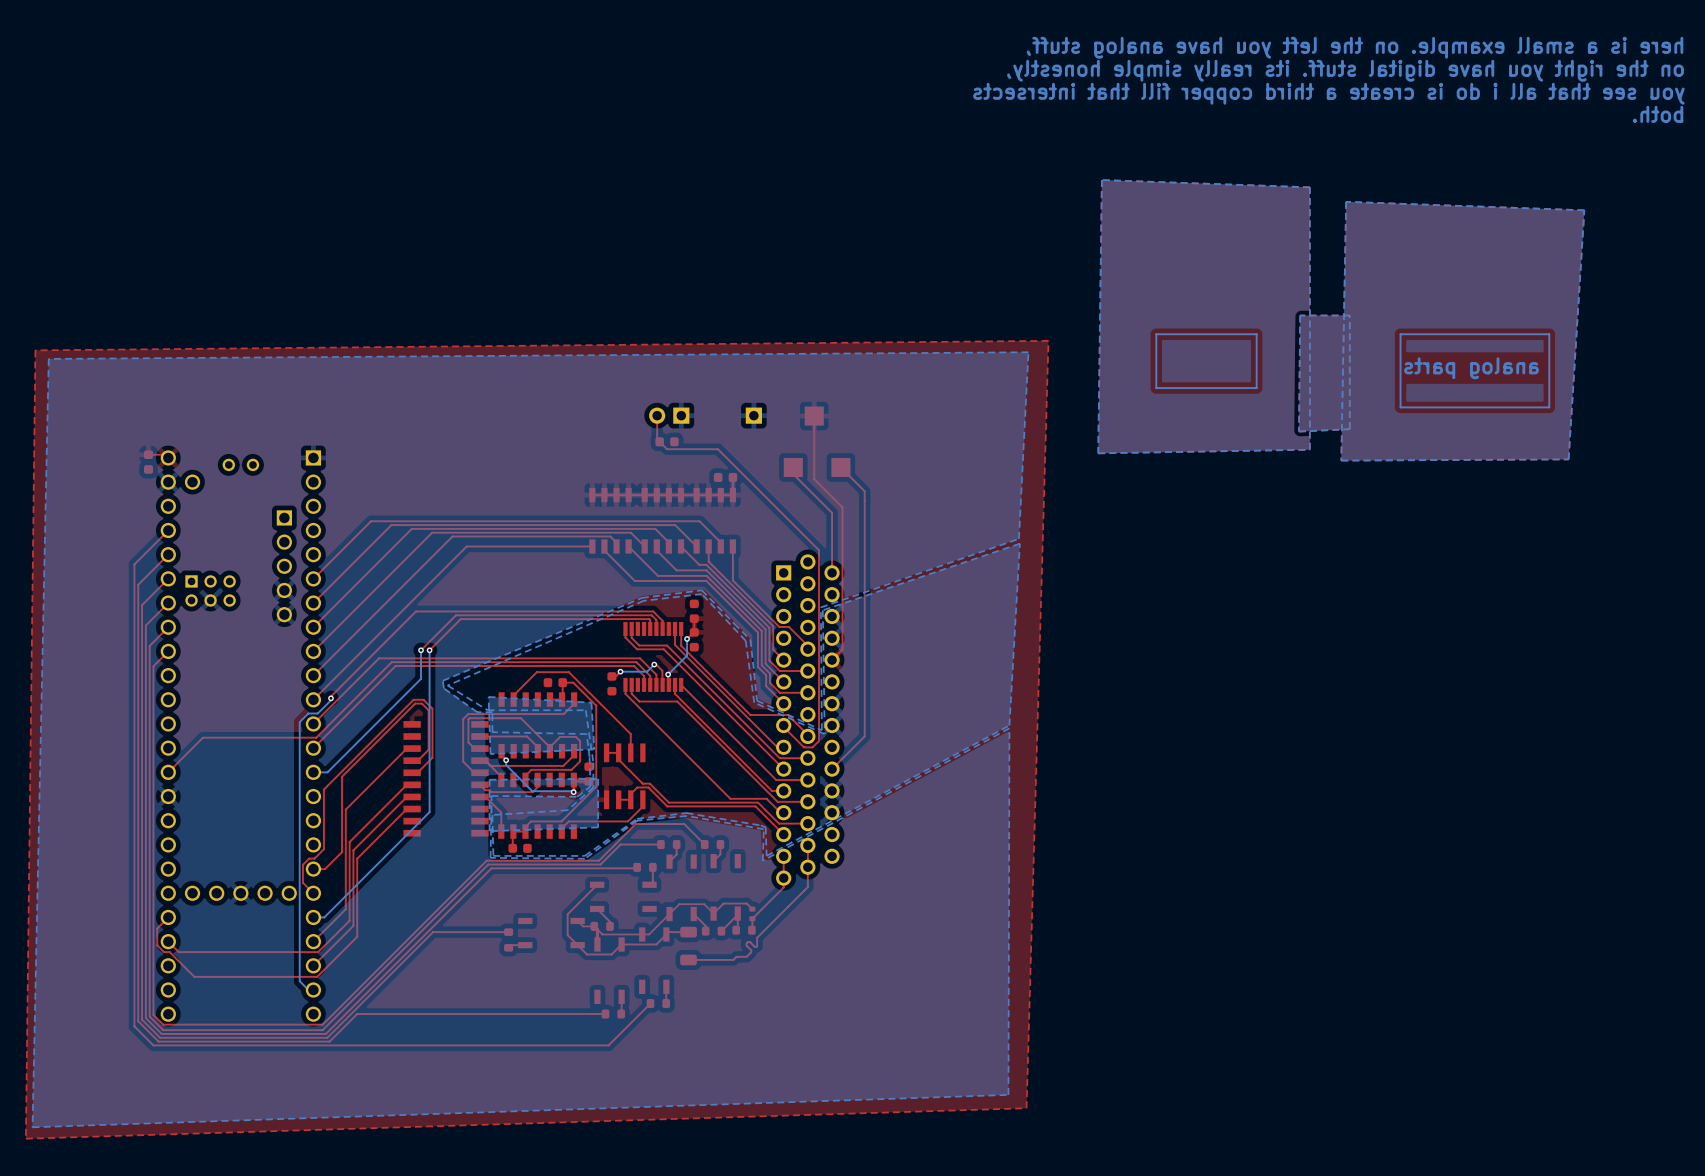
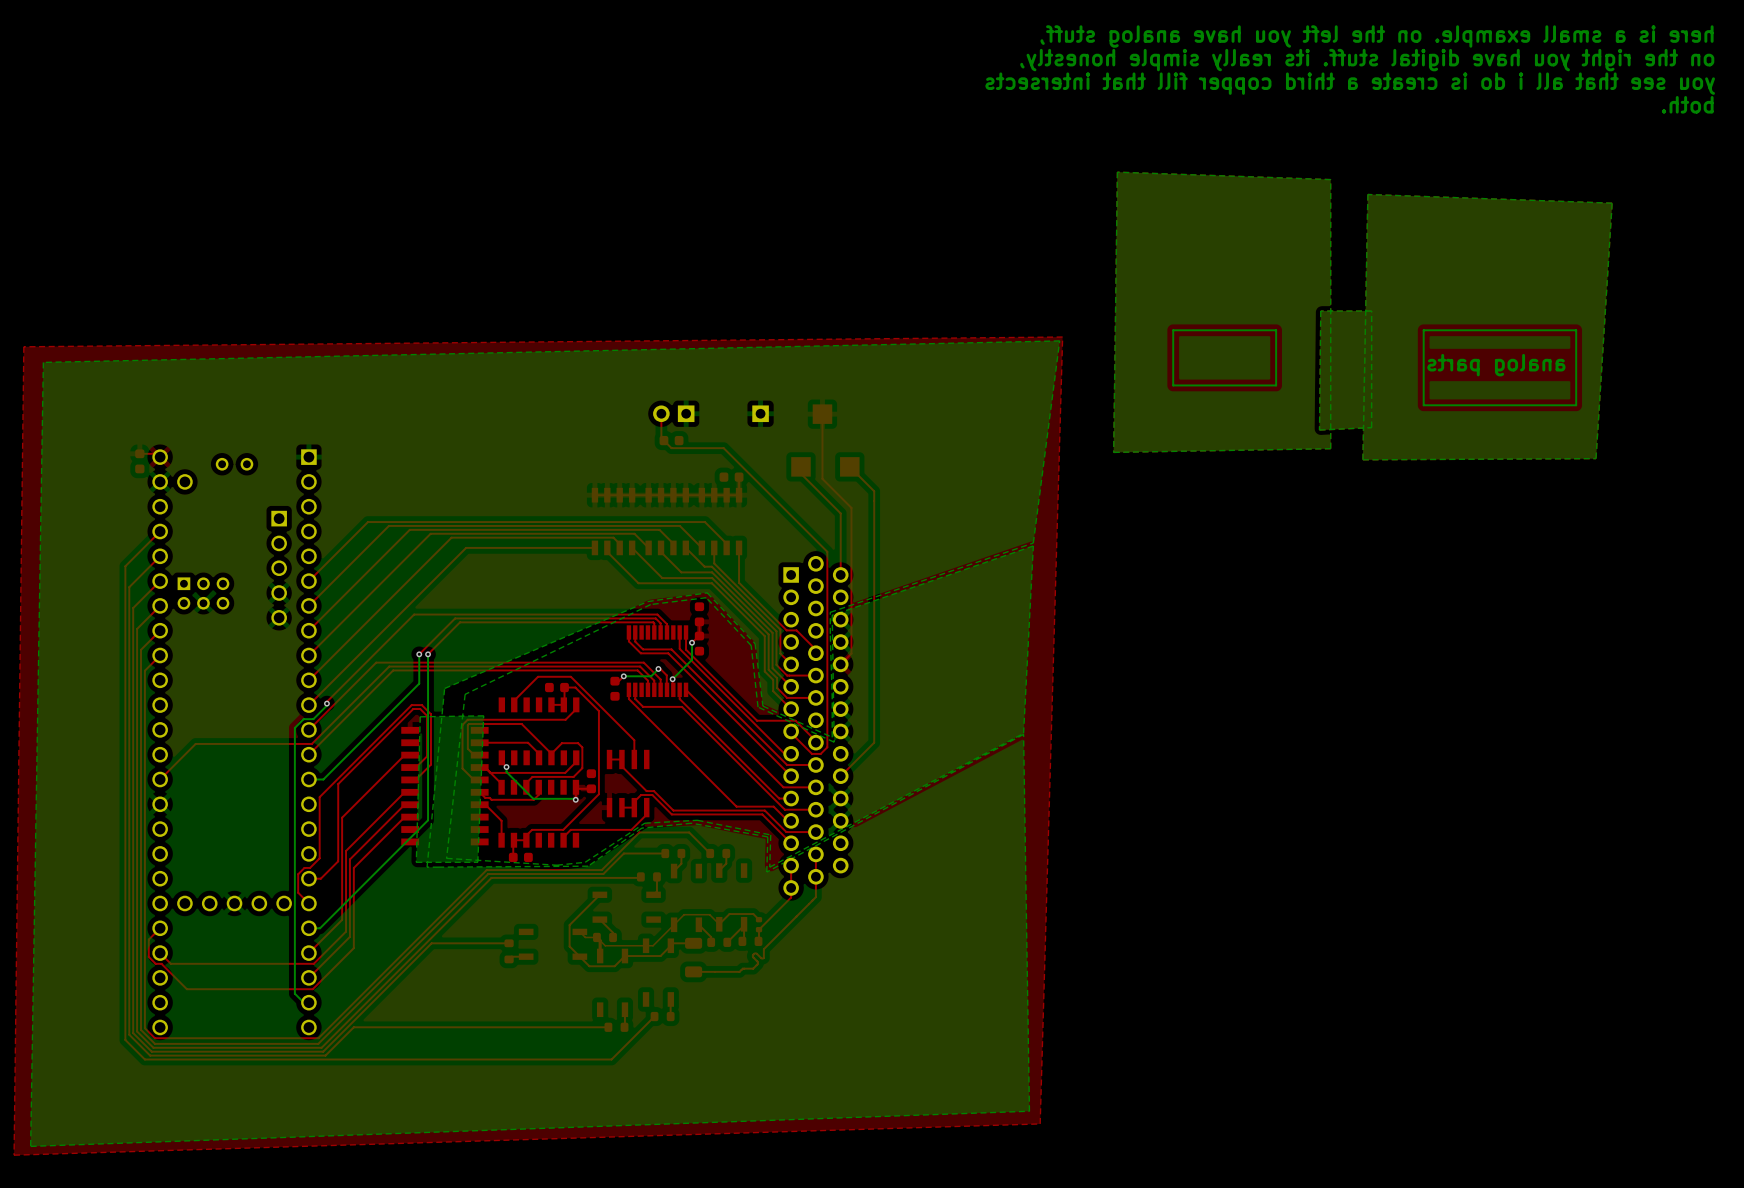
bottom zone outline: (1028, 352) (1018, 538) (820, 607) (821, 730) (757, 700) (750, 639) (701, 590) (641, 597) (442, 680) (443, 688) (477, 712) (492, 712) (492, 732) (586, 734) (590, 786) (577, 796) (491, 795) (490, 857) (584, 858) (637, 820) (686, 815) (763, 829) (762, 860) (1009, 728) (1008, 1094) (32, 1127) (48, 358) (1028, 352) -> (1059, 340) (1033, 543) (830, 612) (832, 737) (762, 706) (755, 643) (707, 592) (647, 601) (444, 688) (427, 867) (588, 866) (641, 828) (691, 823) (767, 836) (766, 872) (1023, 734) (1029, 1111) (30, 1146) (43, 362) (1059, 340)
bottom zone outline: (1019, 543) (822, 610) (824, 734) (754, 702) (745, 640) (701, 594) (643, 600) (447, 685) (487, 710) (585, 710) (593, 762) (593, 787) (567, 810) (492, 815) (493, 855) (584, 855) (637, 818) (686, 813) (765, 827) (766, 855) (1009, 725) (1019, 543) -> (1033, 545) (1023, 733) (769, 867) (770, 834) (697, 820) (644, 823) (585, 862) (556, 865) (446, 858) (465, 694) (650, 604) (706, 597) (751, 645) (758, 707) (834, 742) (832, 615) (1033, 545)
bottom zone outline: (488, 696) (490, 754) (594, 749) (591, 702) (488, 696) -> none
bottom zone outline: none -> (483, 715) (420, 716) (416, 862) (477, 862) (483, 715)
bottom zone outline: (598, 778) (598, 827) (489, 831) (489, 779) (598, 778) -> none

